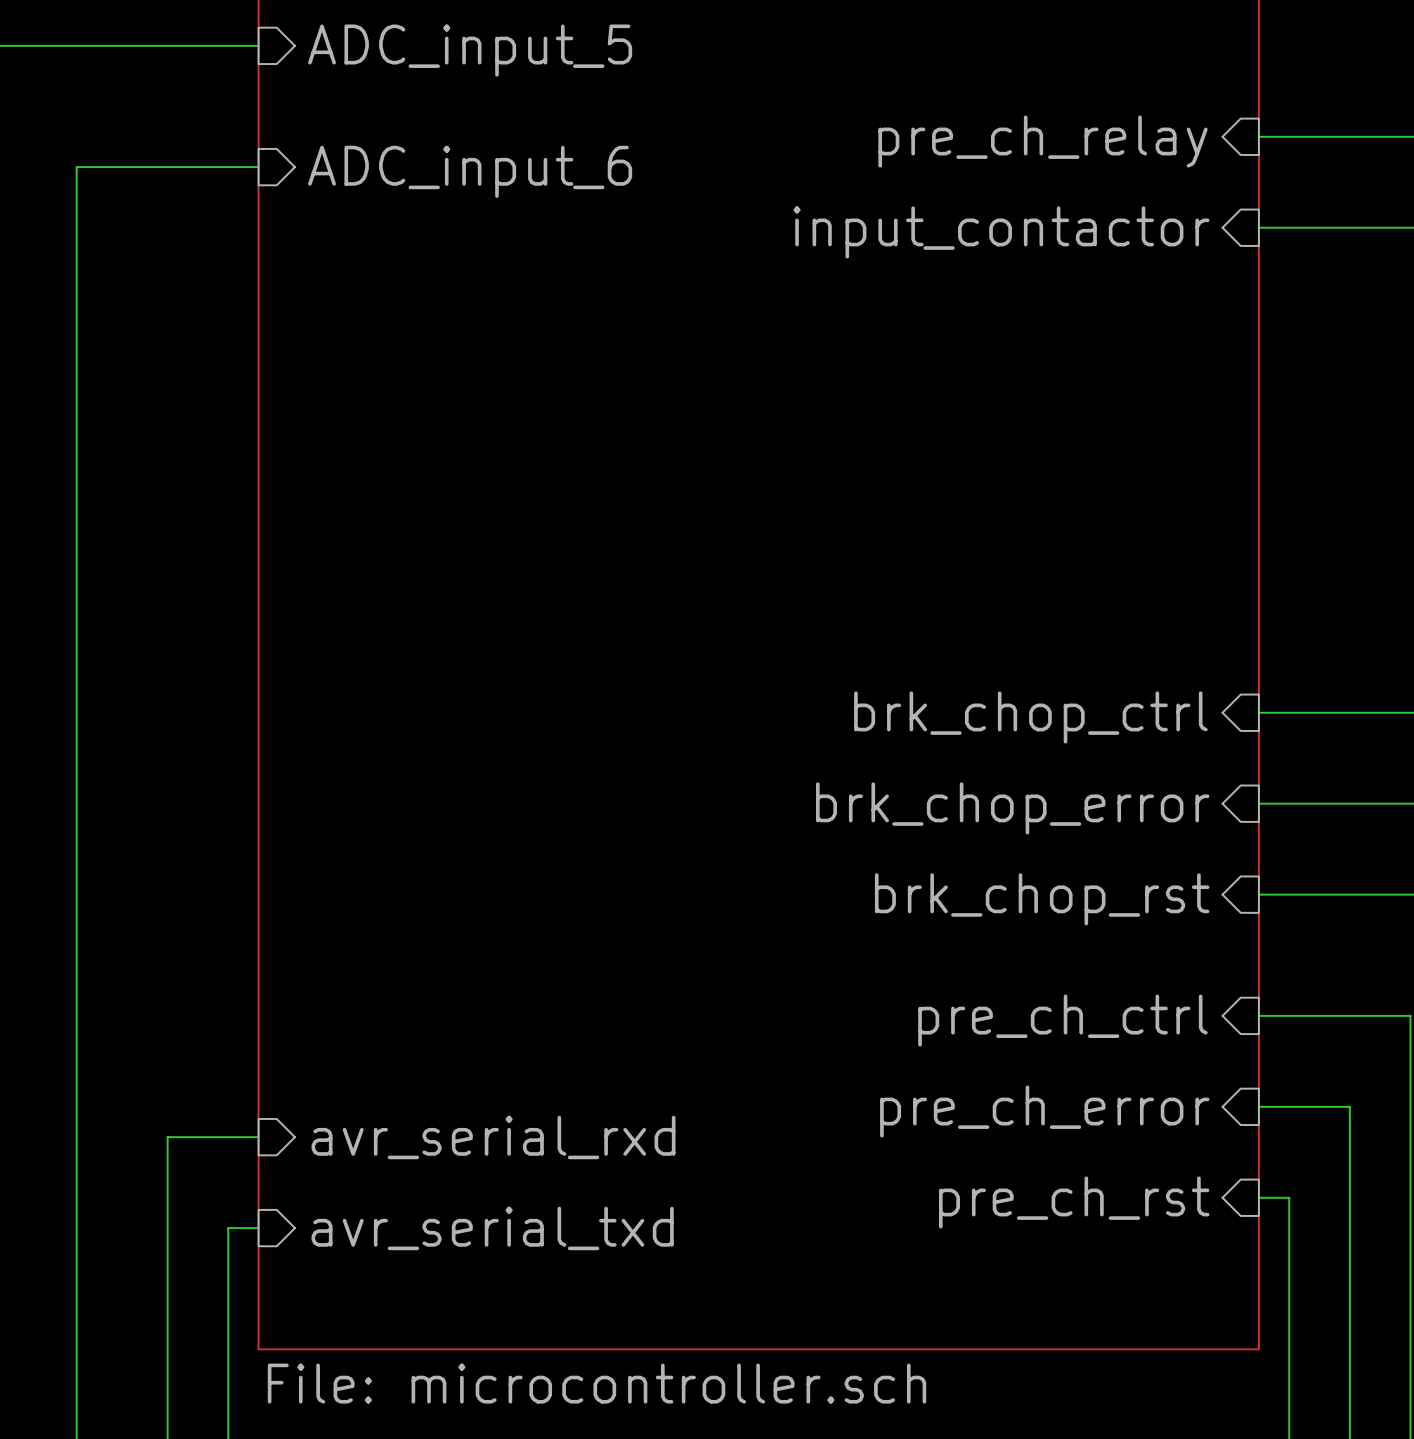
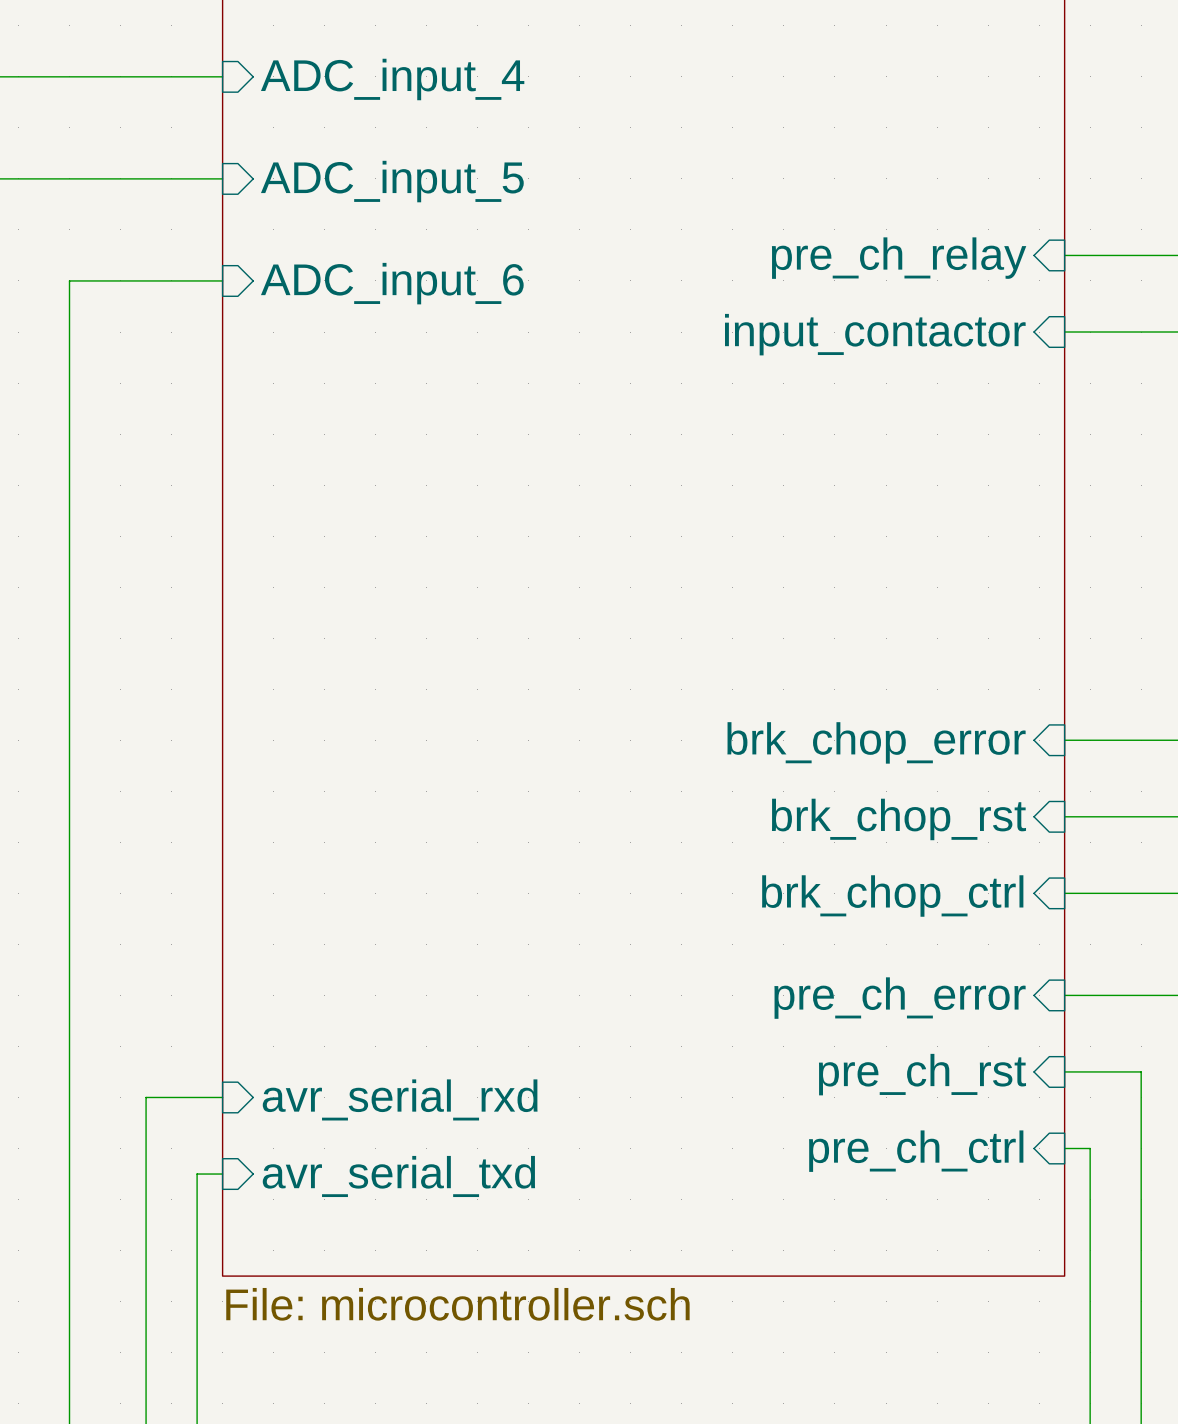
sheet pin: brk_chop_ctrl (1030, 717) -> brk_chop_error (876, 742)
sheet pin: brk_chop_error (1012, 808) -> brk_chop_rst (898, 819)
sheet pin: brk_chop_rst (1042, 899) -> brk_chop_ctrl (892, 896)
sheet pin: pre_ch_ctrl (1062, 1020) -> pre_ch_error (900, 998)
sheet pin: pre_ch_error (1044, 1111) -> pre_ch_rst (922, 1074)
sheet pin: pre_ch_rst (1074, 1202) -> pre_ch_ctrl (916, 1151)

